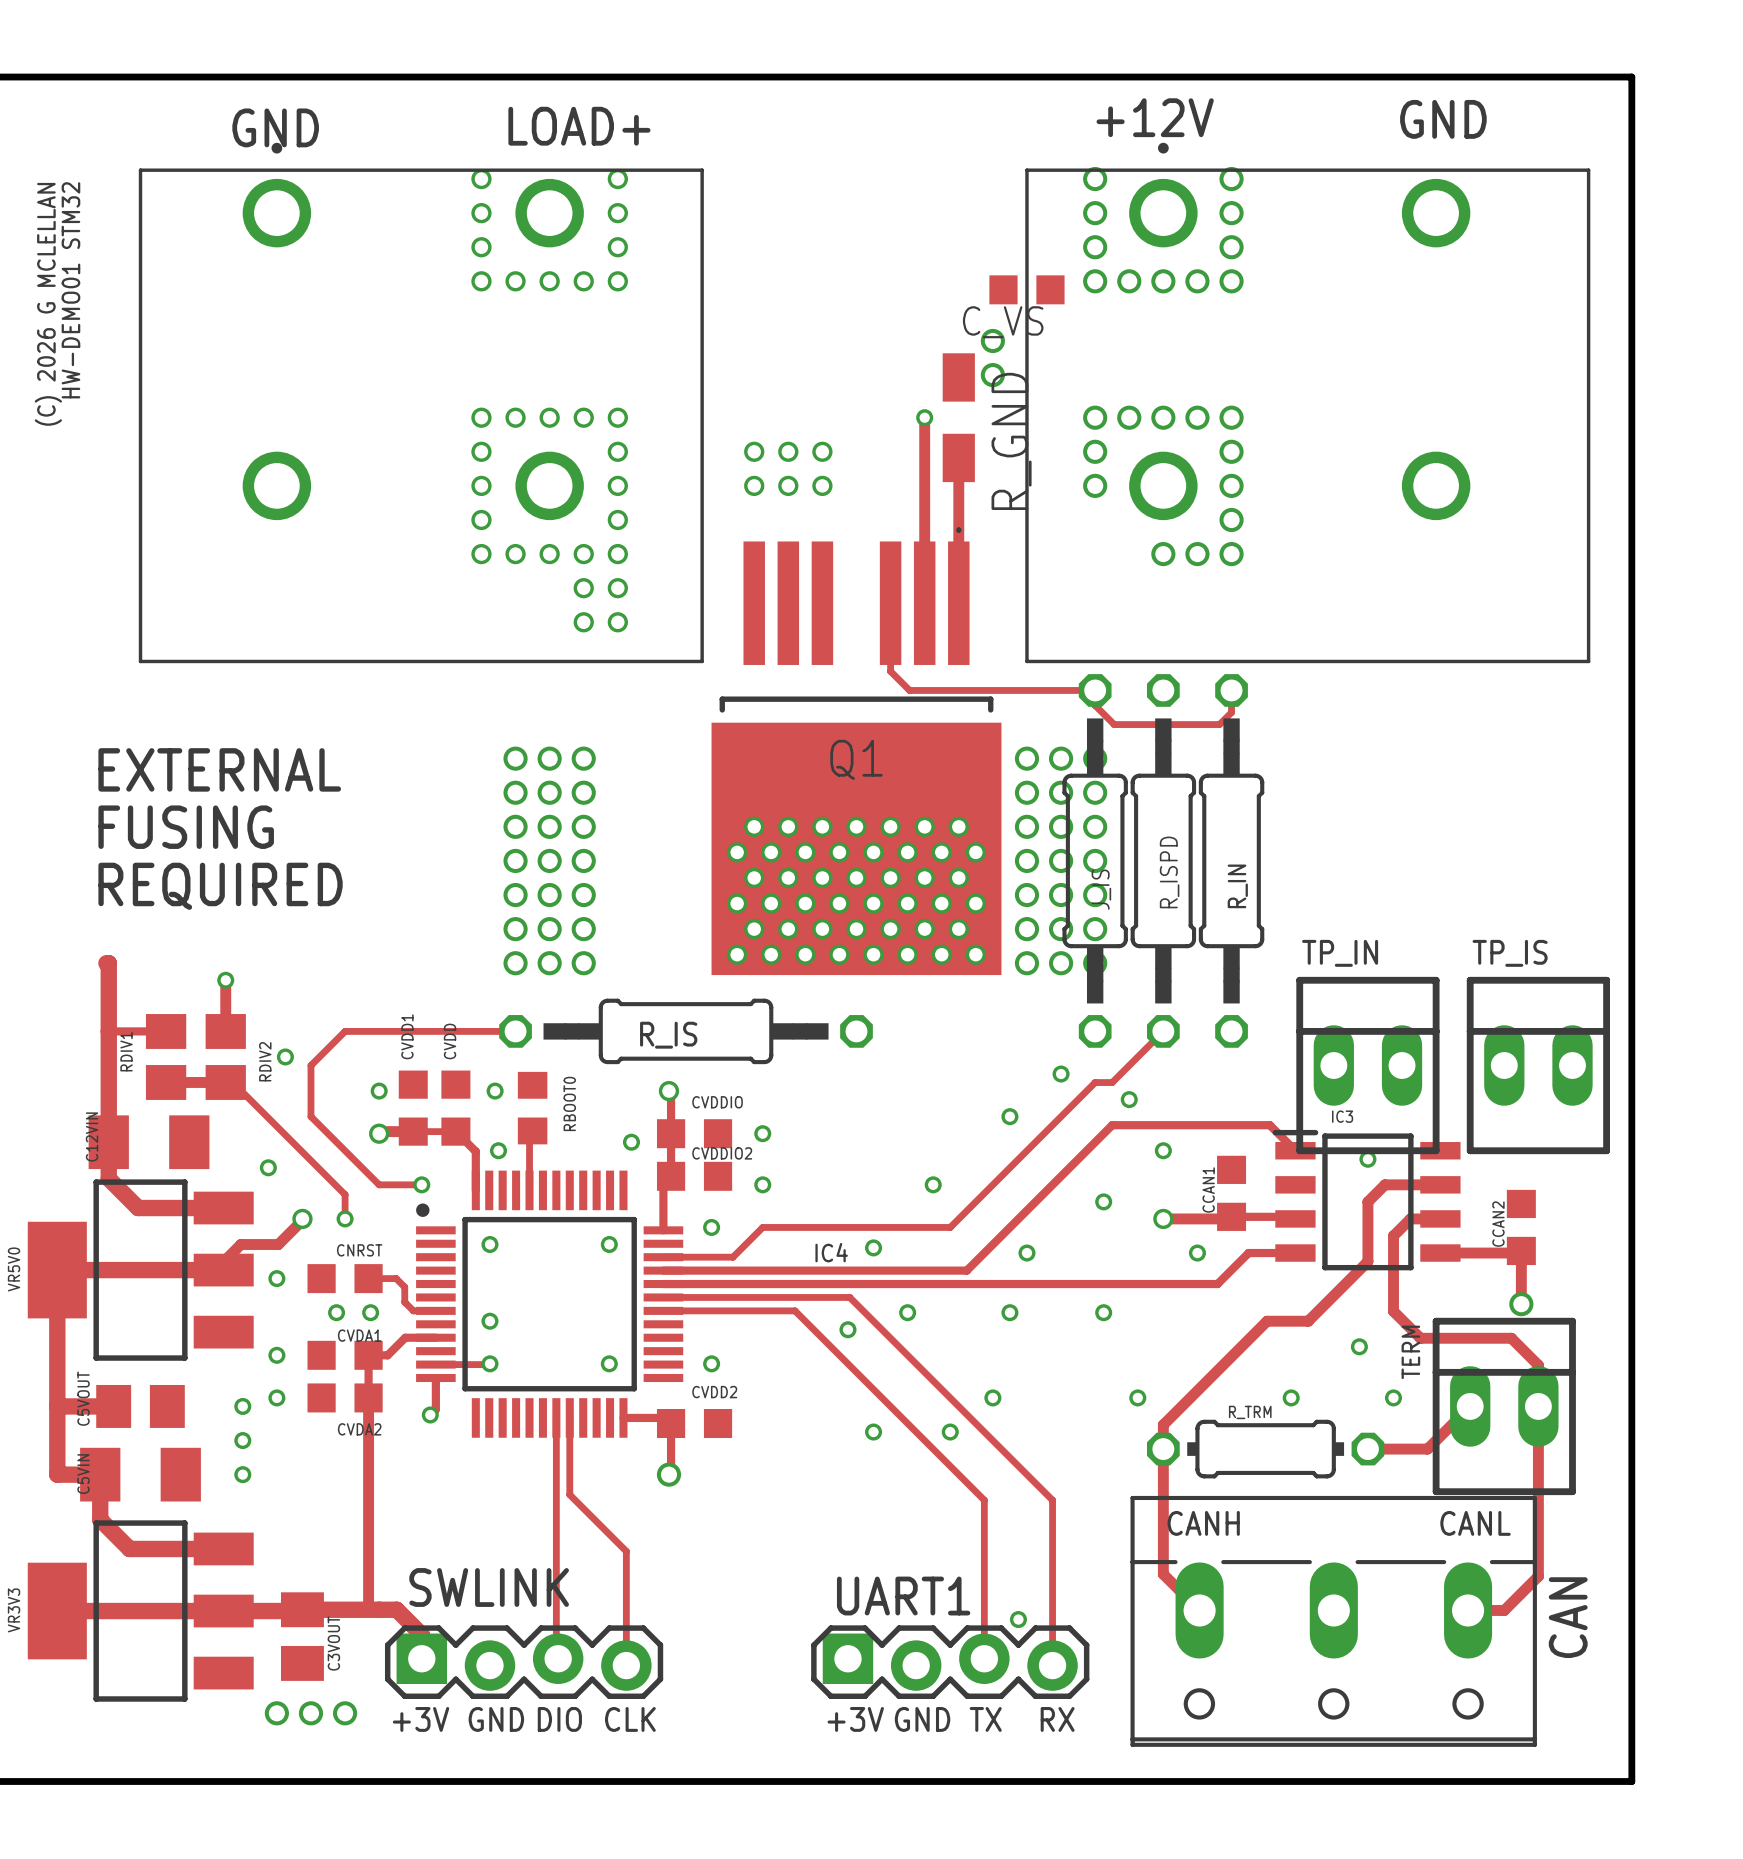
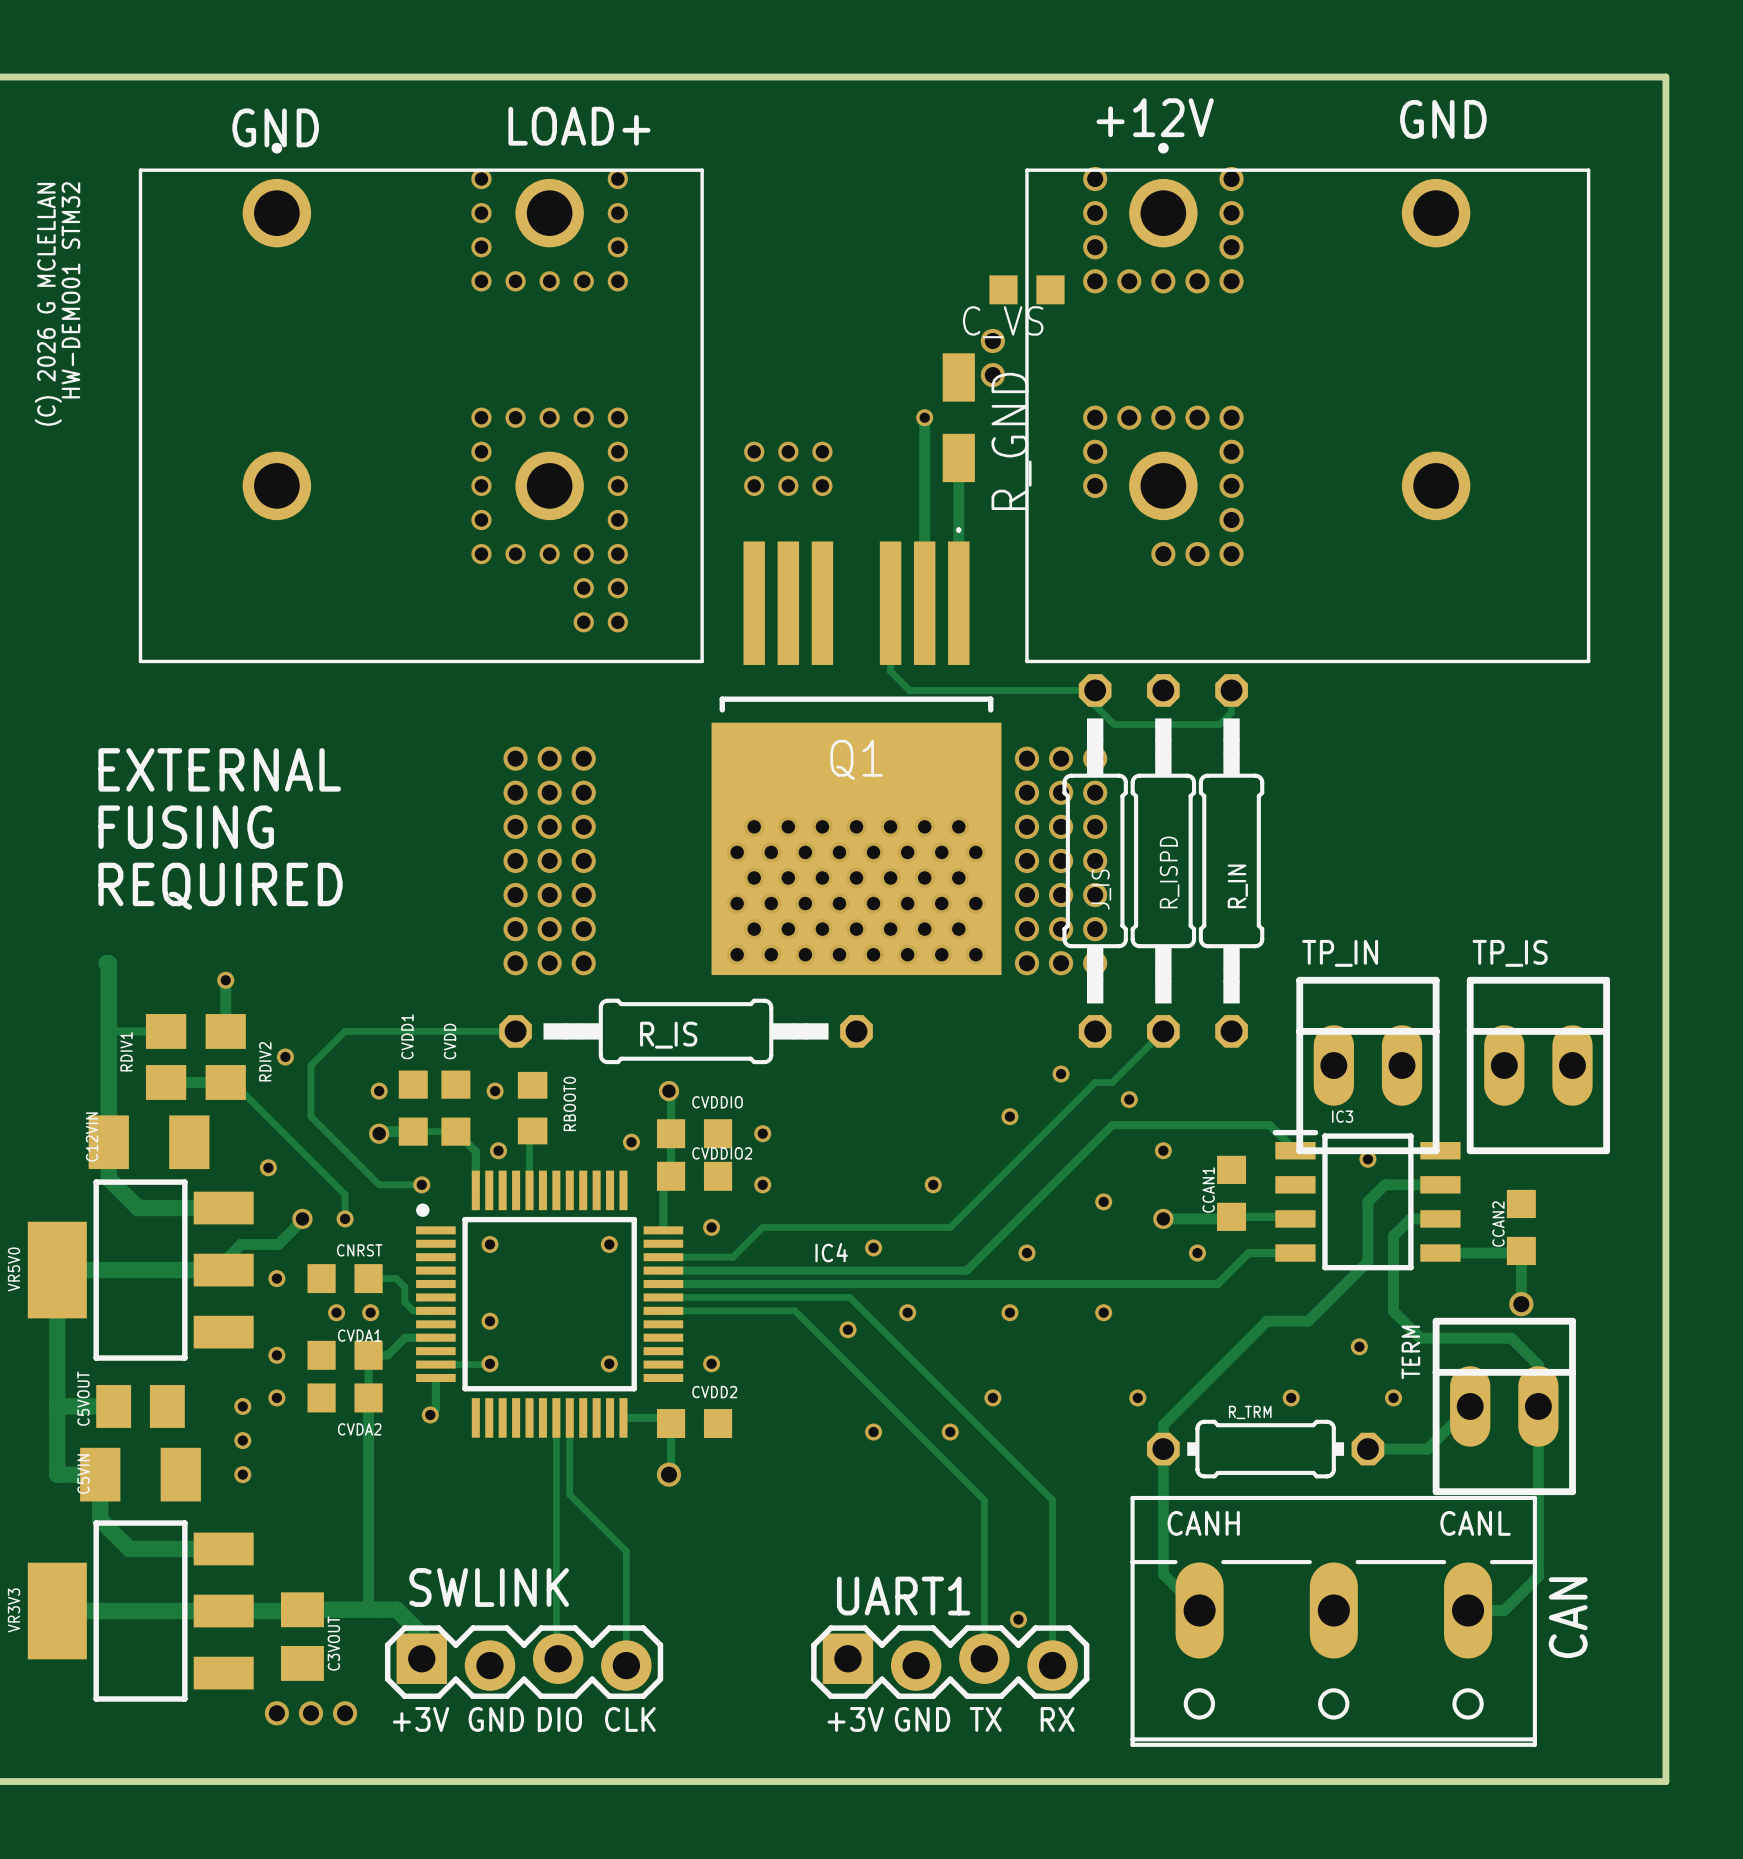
board edge: (1631, 77) (1631, 1781) -> (1631, 77) (1665, 77) (1665, 1781) (1631, 1781)

